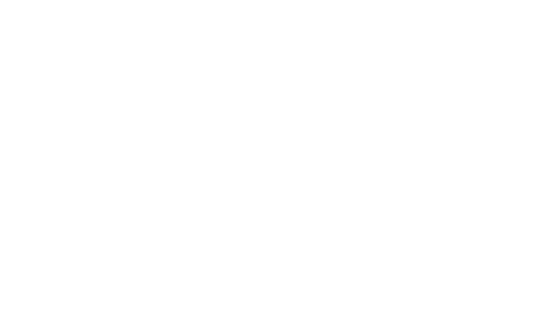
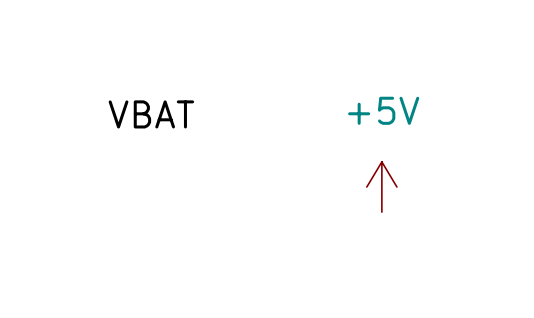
label: none -> VBAT (151, 114)
power symbol: none -> +5V (381, 187)

